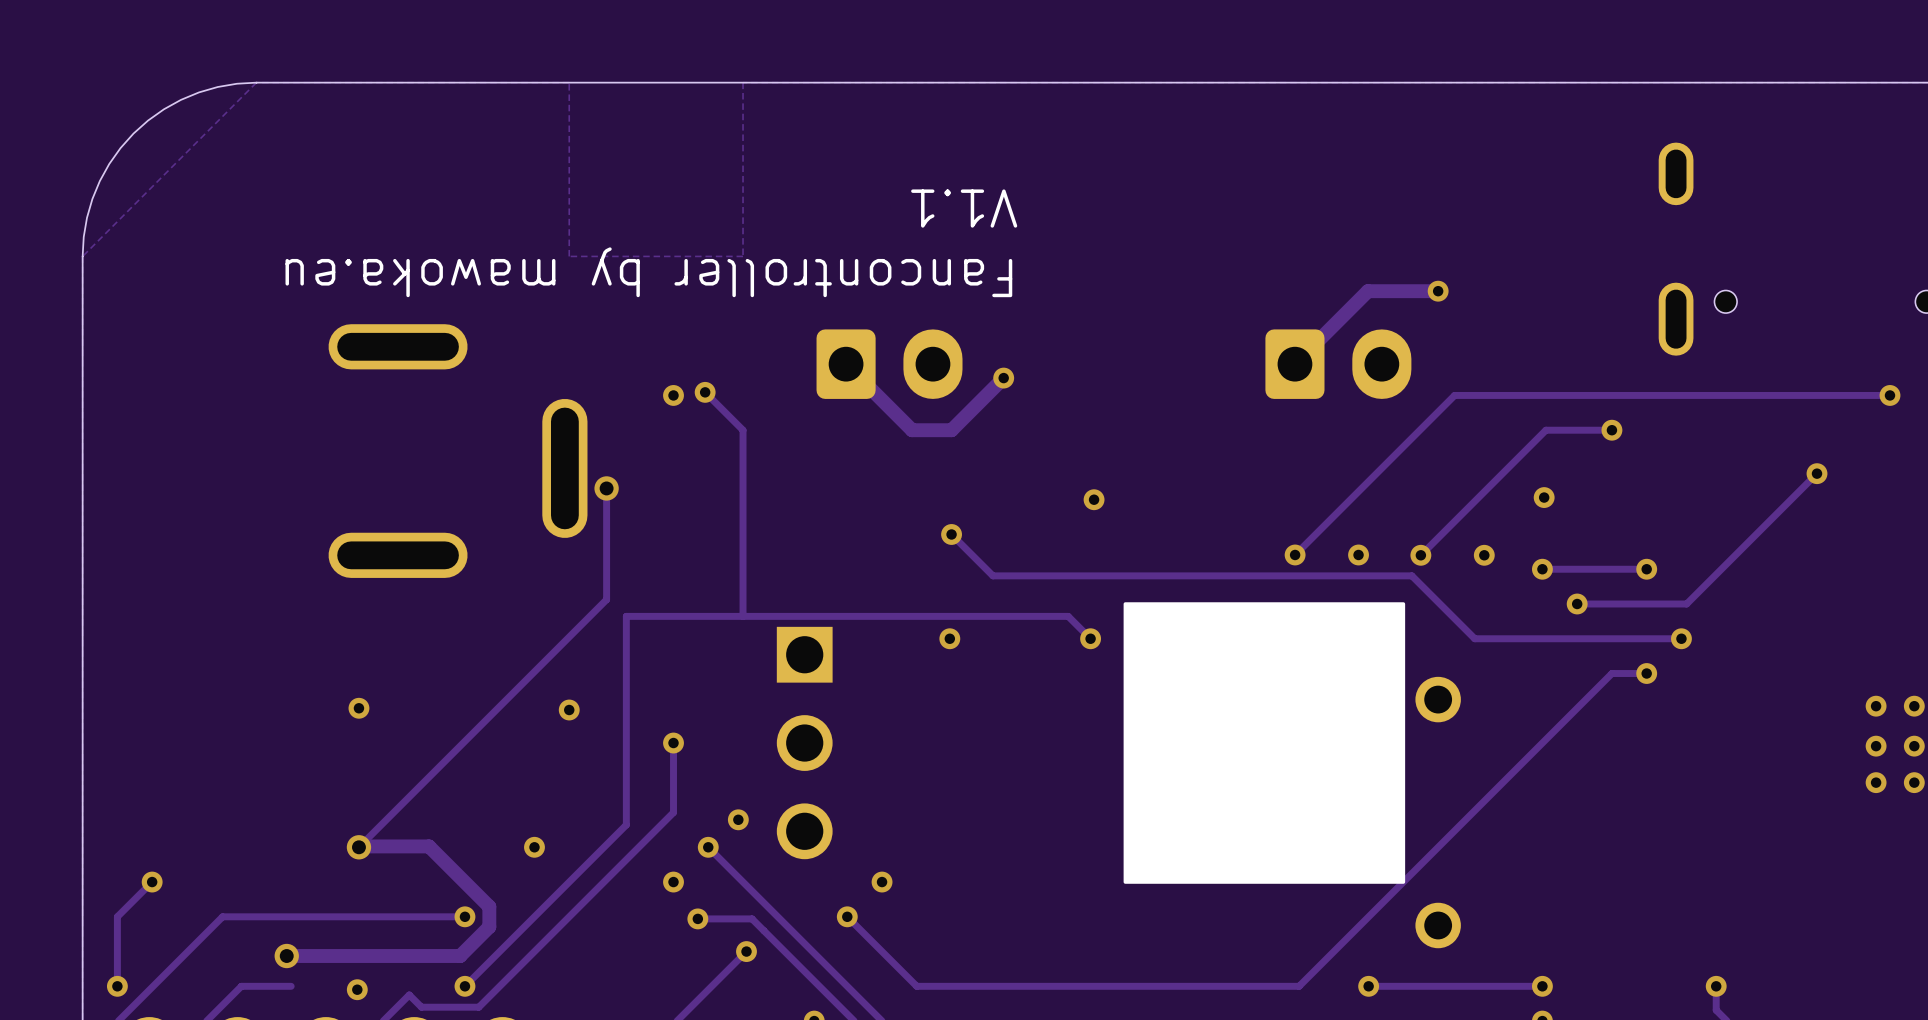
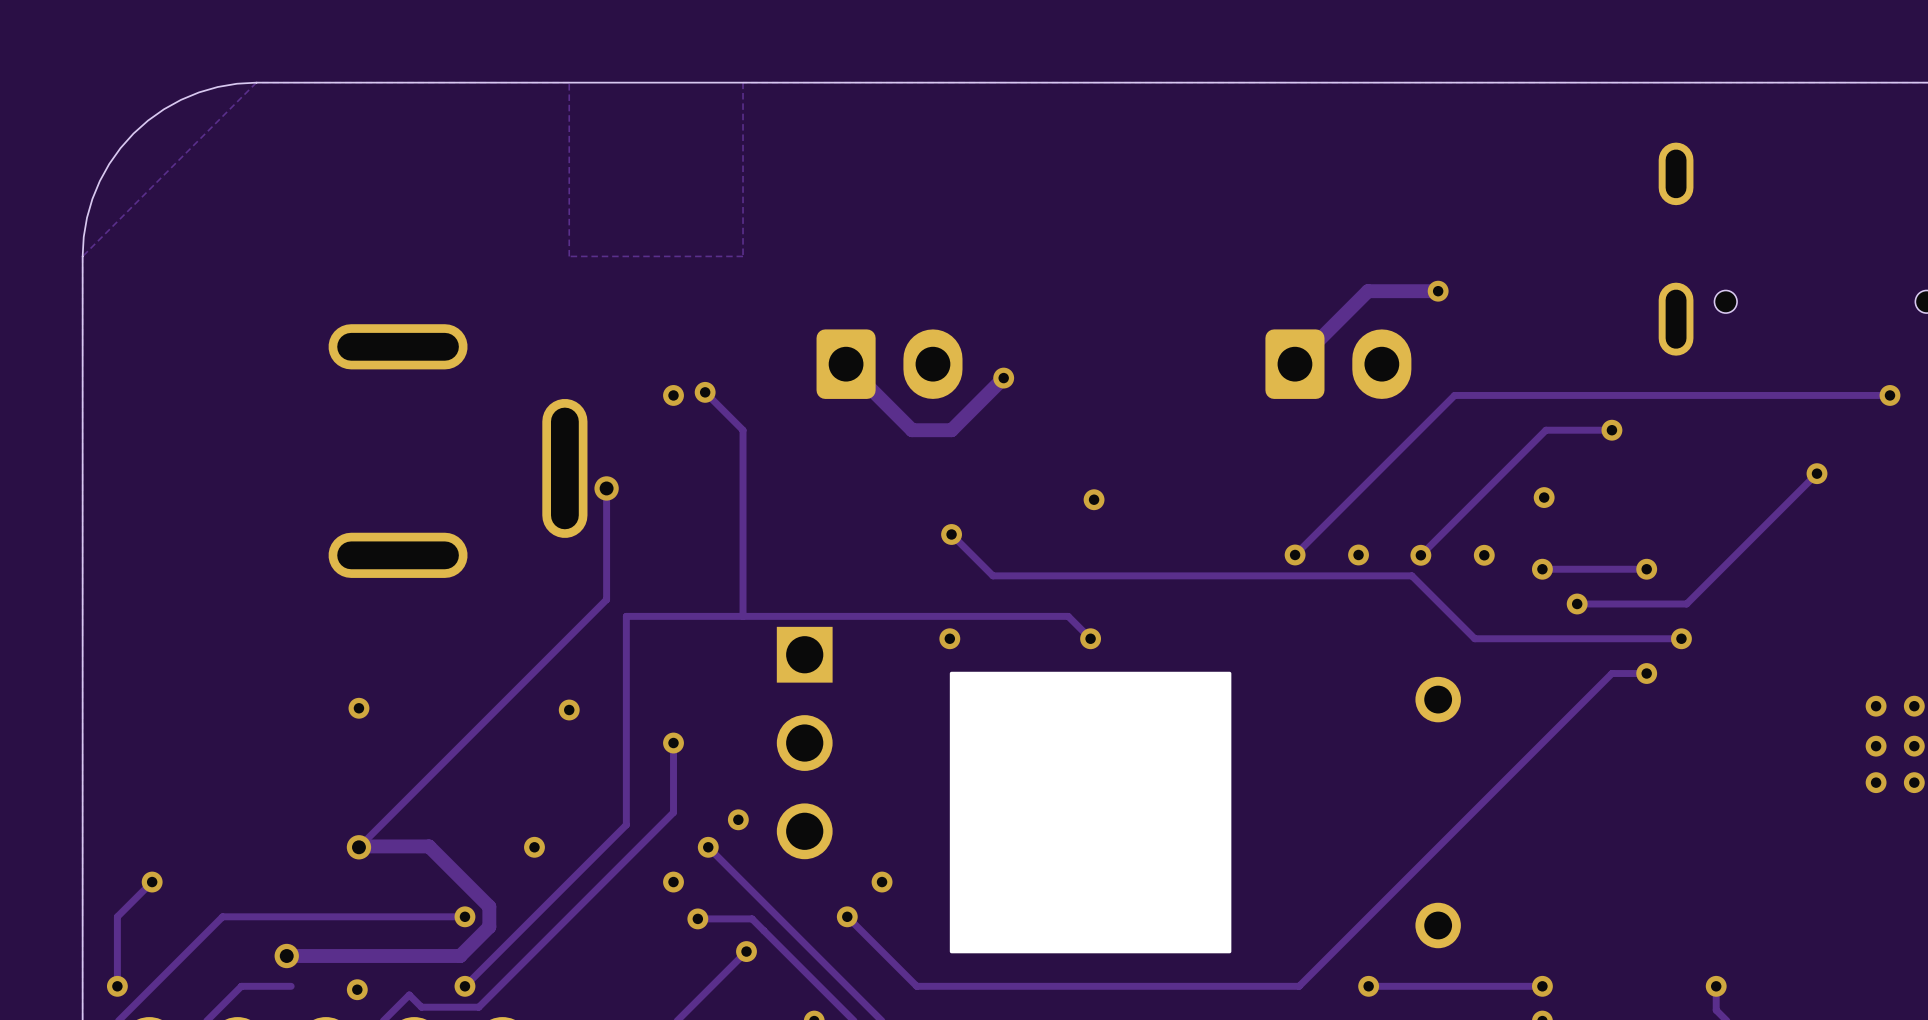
text: V1.1 (964, 208) -> none
text: Fancontroller by mawoka.eu (648, 272) -> none
drawing position: (1264, 743) -> (1090, 812)

